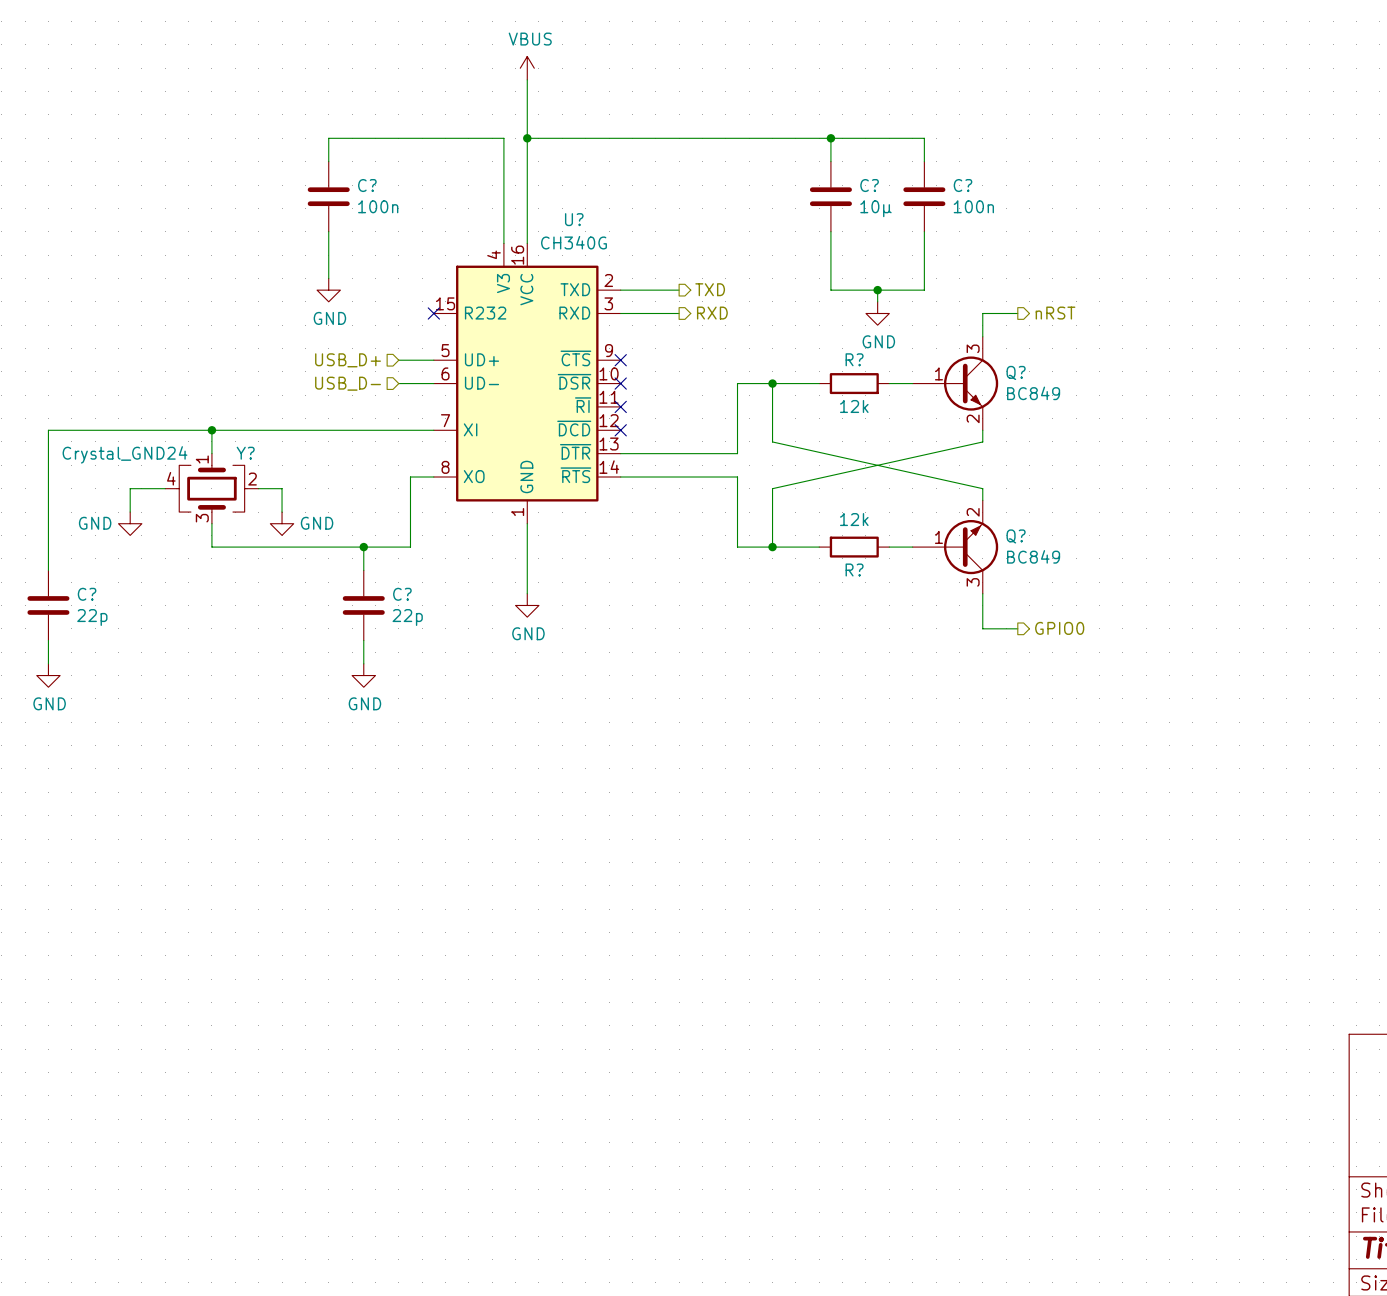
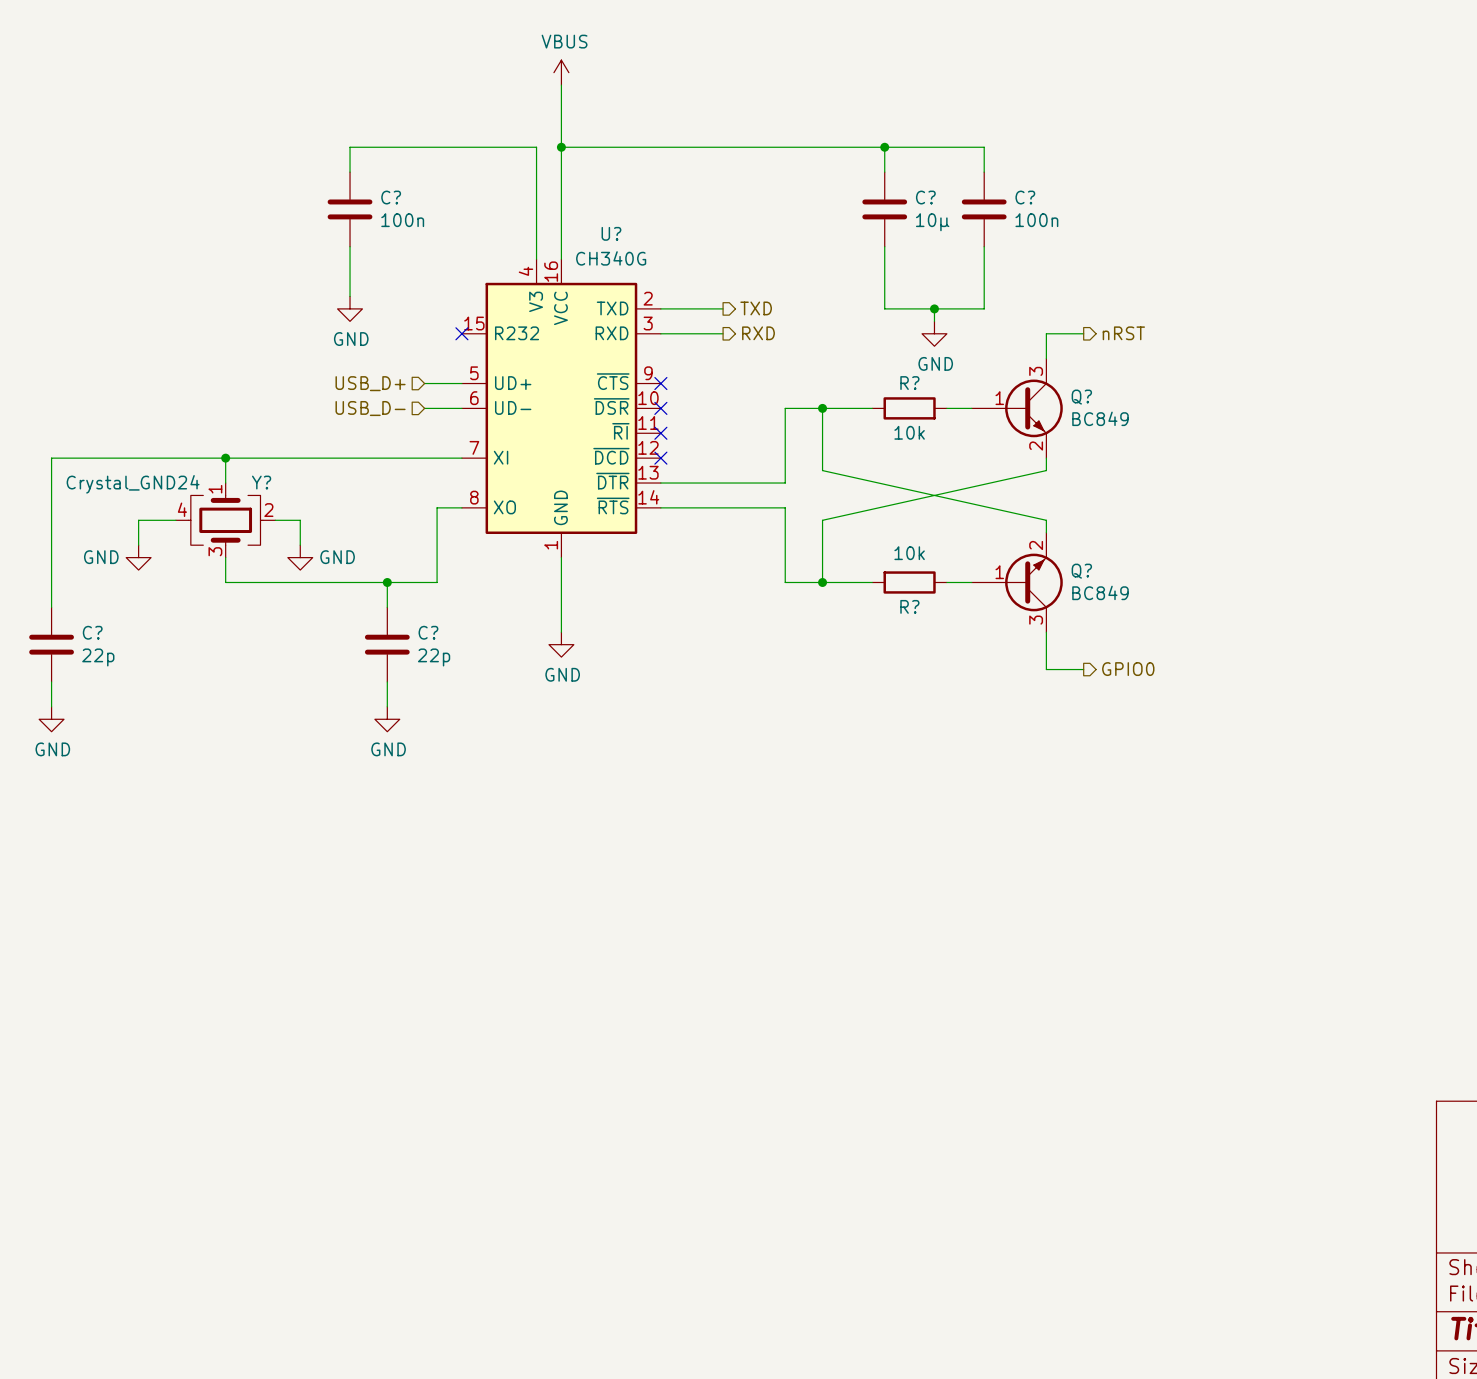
R? value: 12k (854, 406) -> 10k (909, 432)
R? value: 12k (854, 519) -> 10k (909, 553)

